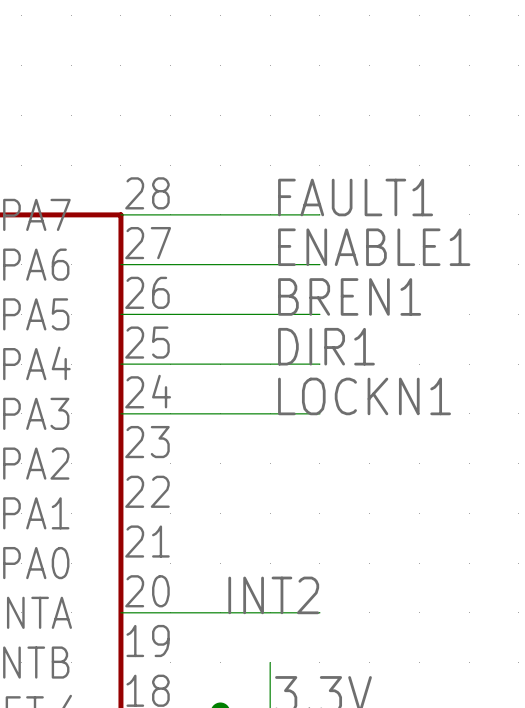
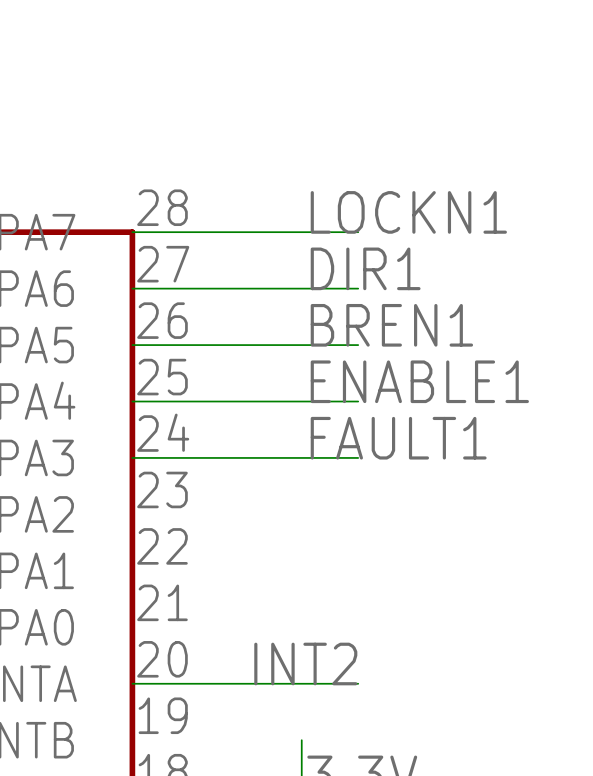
label: FAULT1 (355, 197) -> LOCKN1 (408, 212)
label: ENABLE1 (374, 247) -> DIR1 (365, 268)
label: DIR1 (326, 346) -> ENABLE1 (419, 381)
label: LOCKN1 (364, 396) -> FAULT1 (398, 438)

